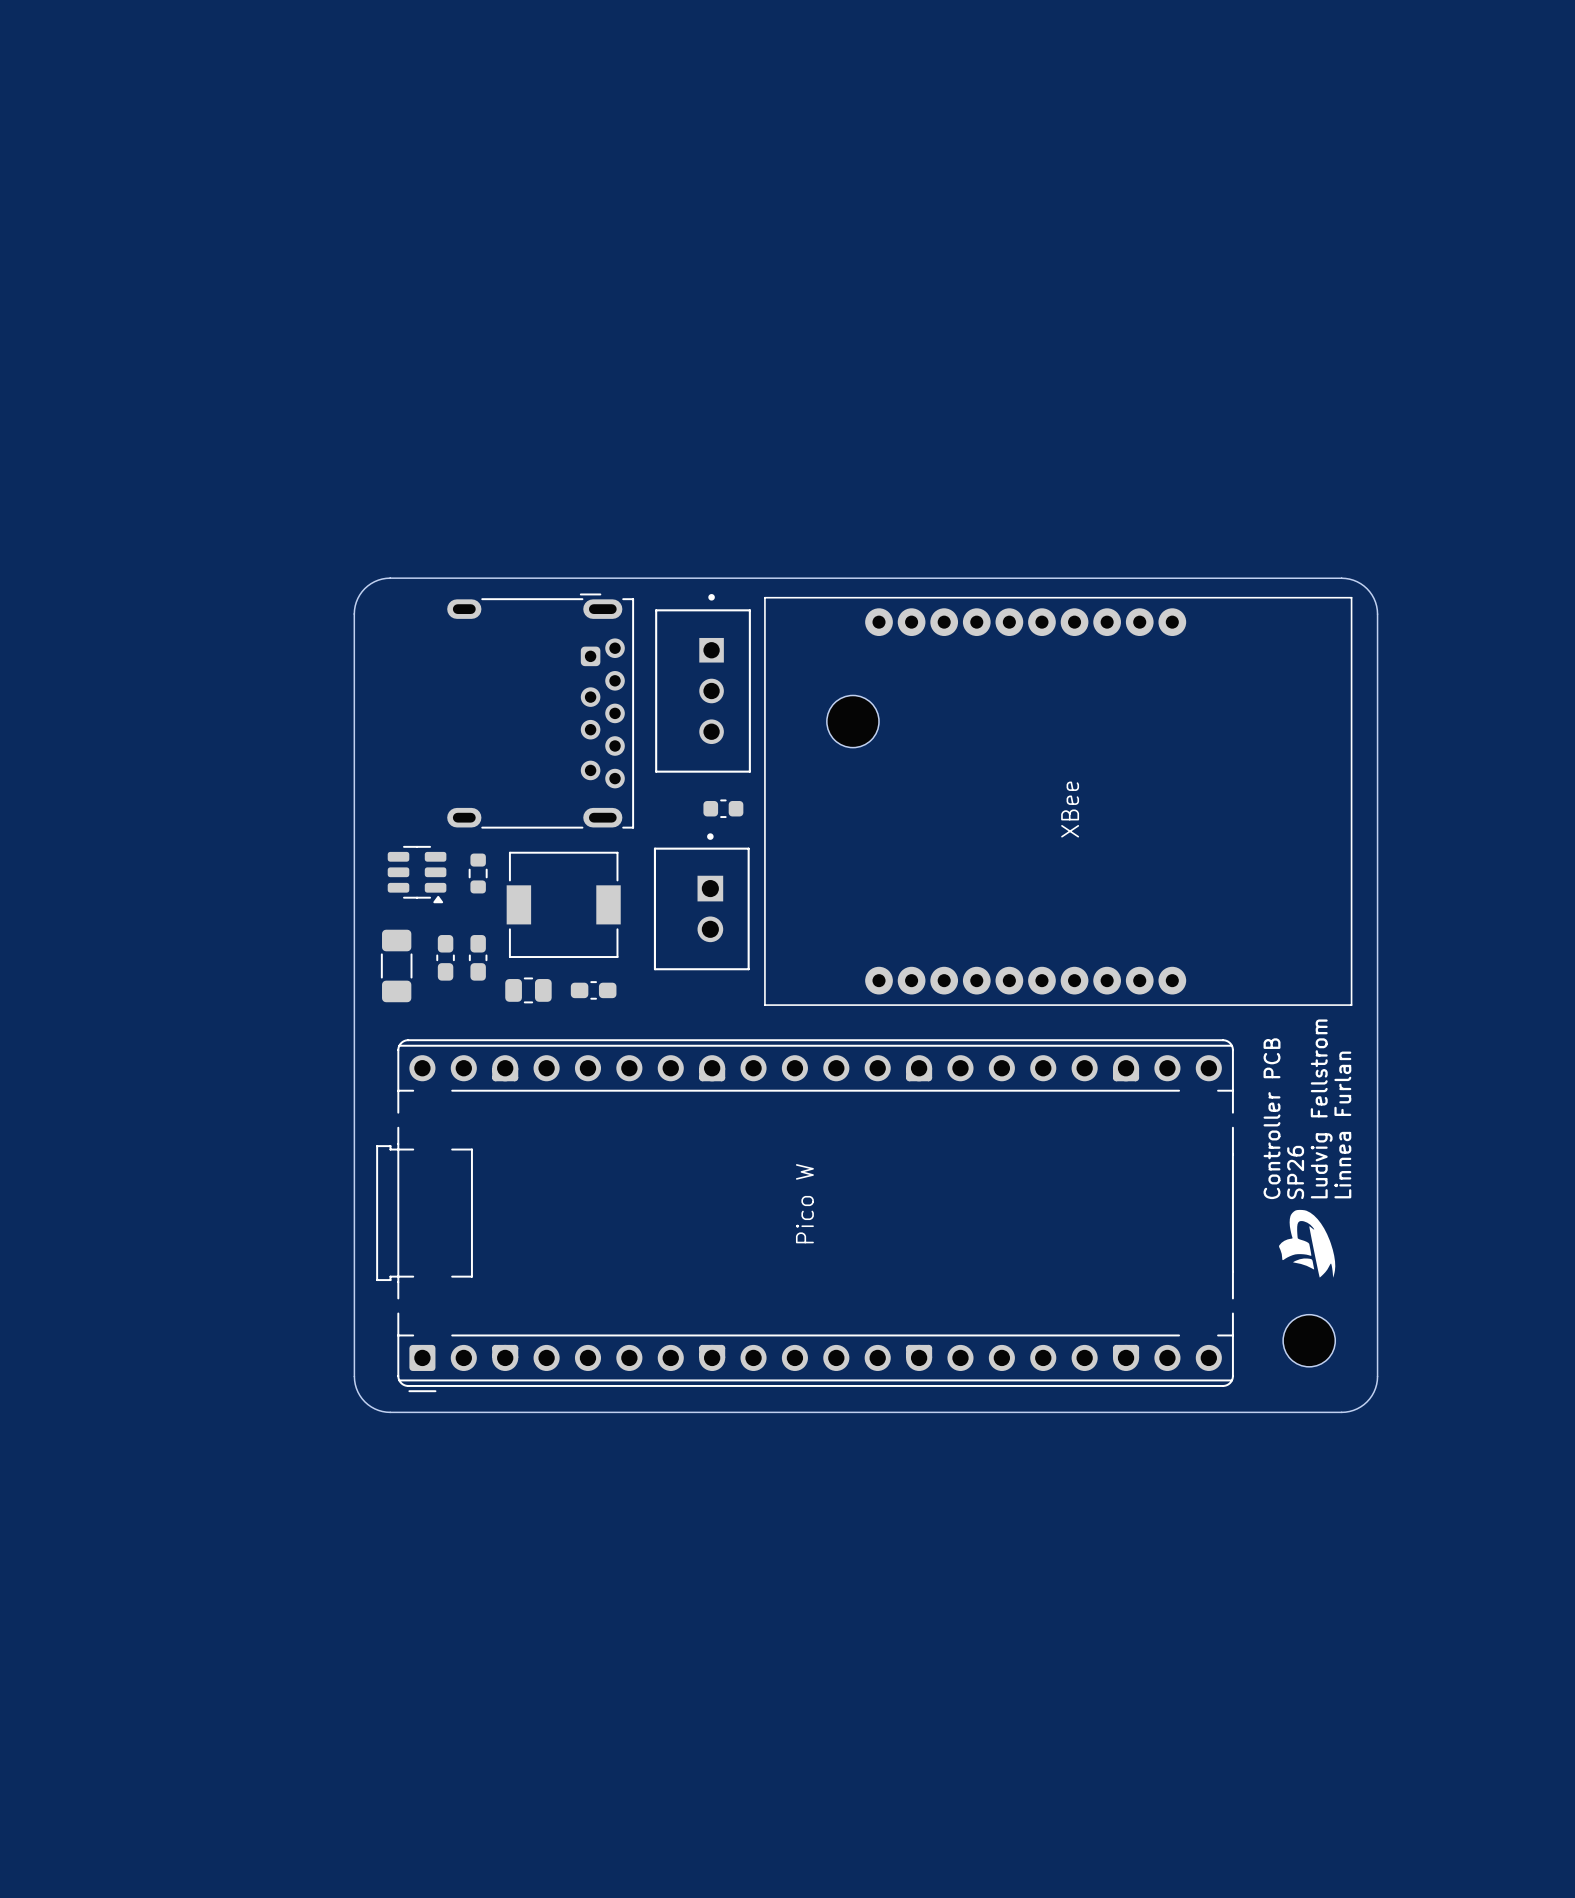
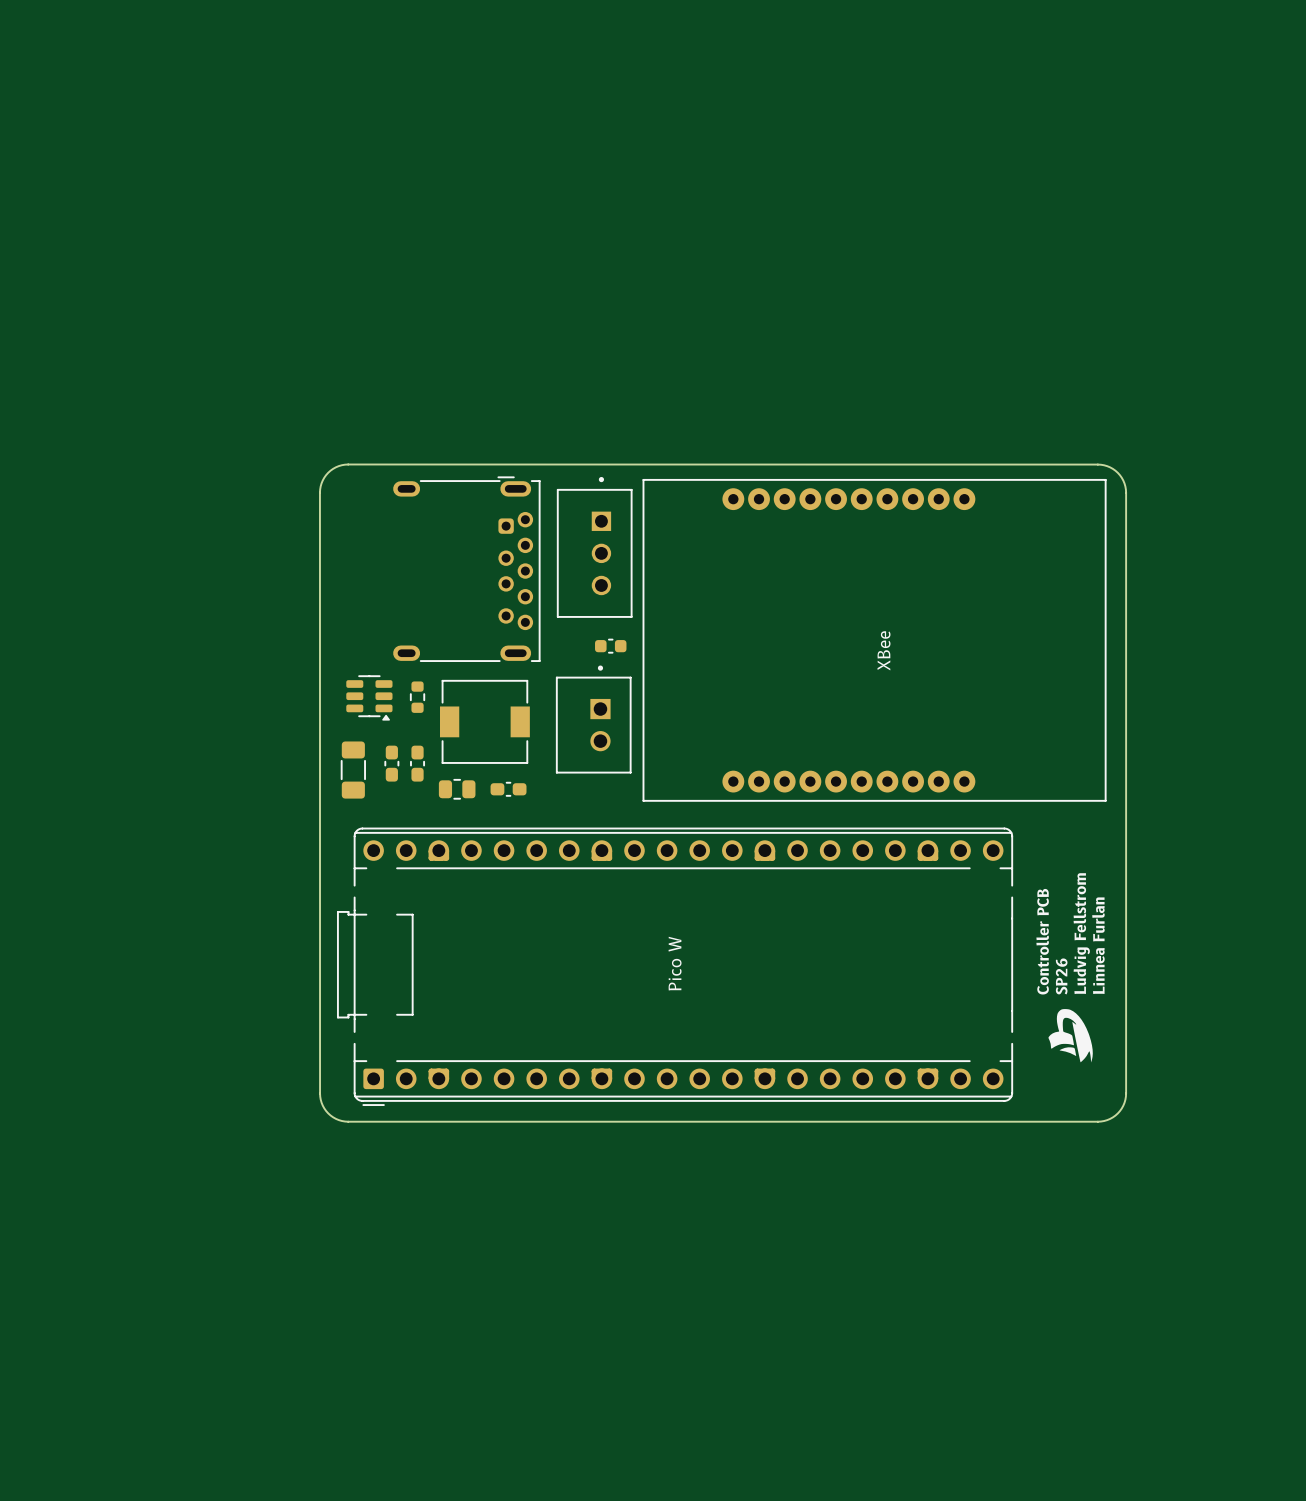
part: (852, 721) -> none
text position: Ludvig Fellstrom (1321, 1108) -> Ludvig Fellstrom (1081, 933)
text position: Controller PCB (1272, 1118) -> Controller PCB (1042, 941)
text position: Linnea Furlan (1342, 1124) -> Linnea Furlan (1098, 945)
text position: SP26 (1295, 1172) -> SP26 (1061, 976)
drawing position: (1307, 1243) -> (1070, 1035)
part: (1309, 1340) -> none

